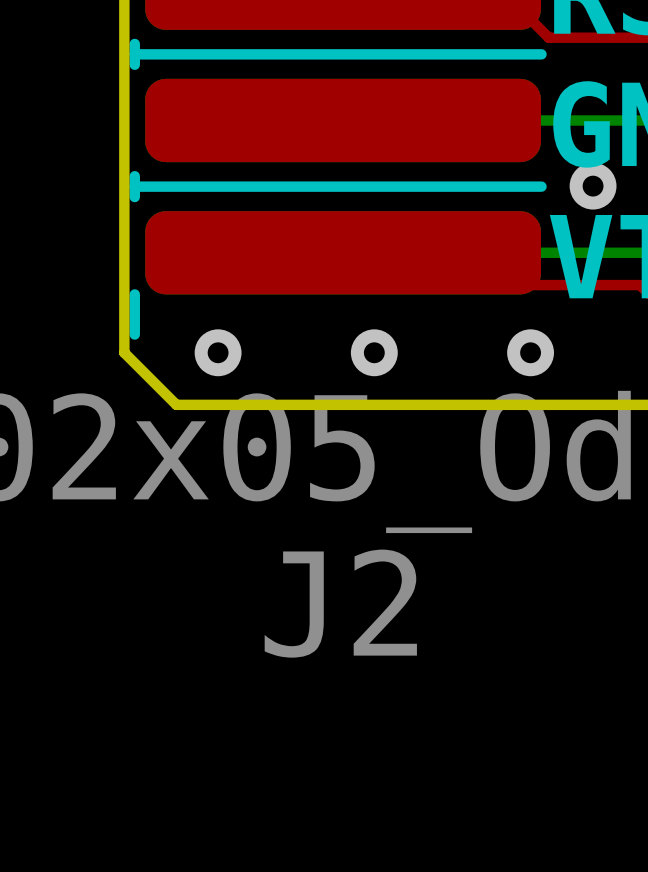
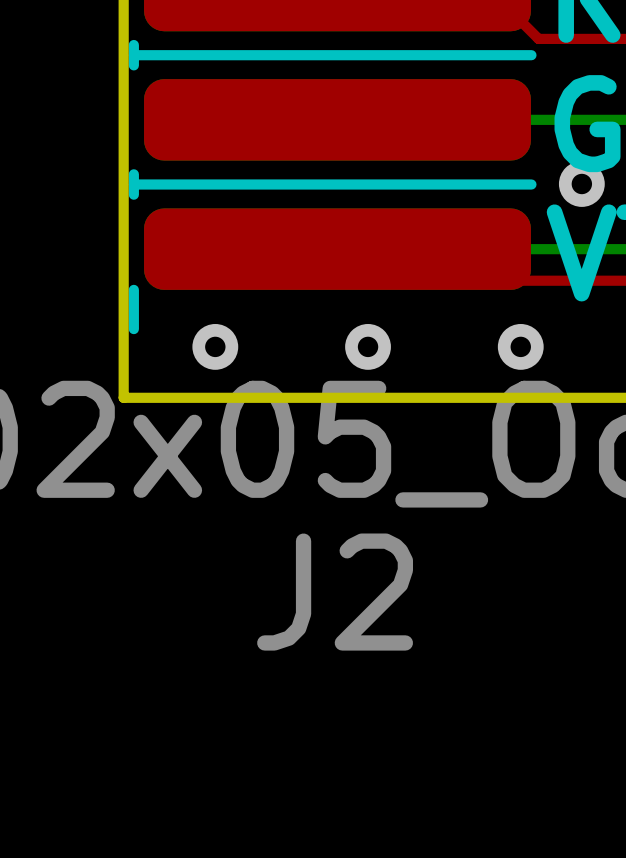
board edge: (124, 352) (176, 404) -> (123, 346) (123, 397) (174, 397)

